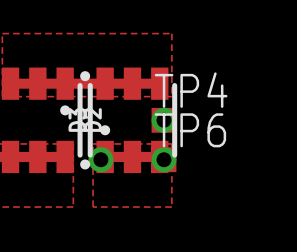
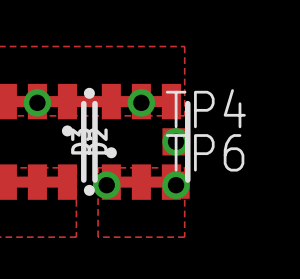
via: none -> (37, 102)
via: none -> (141, 102)

